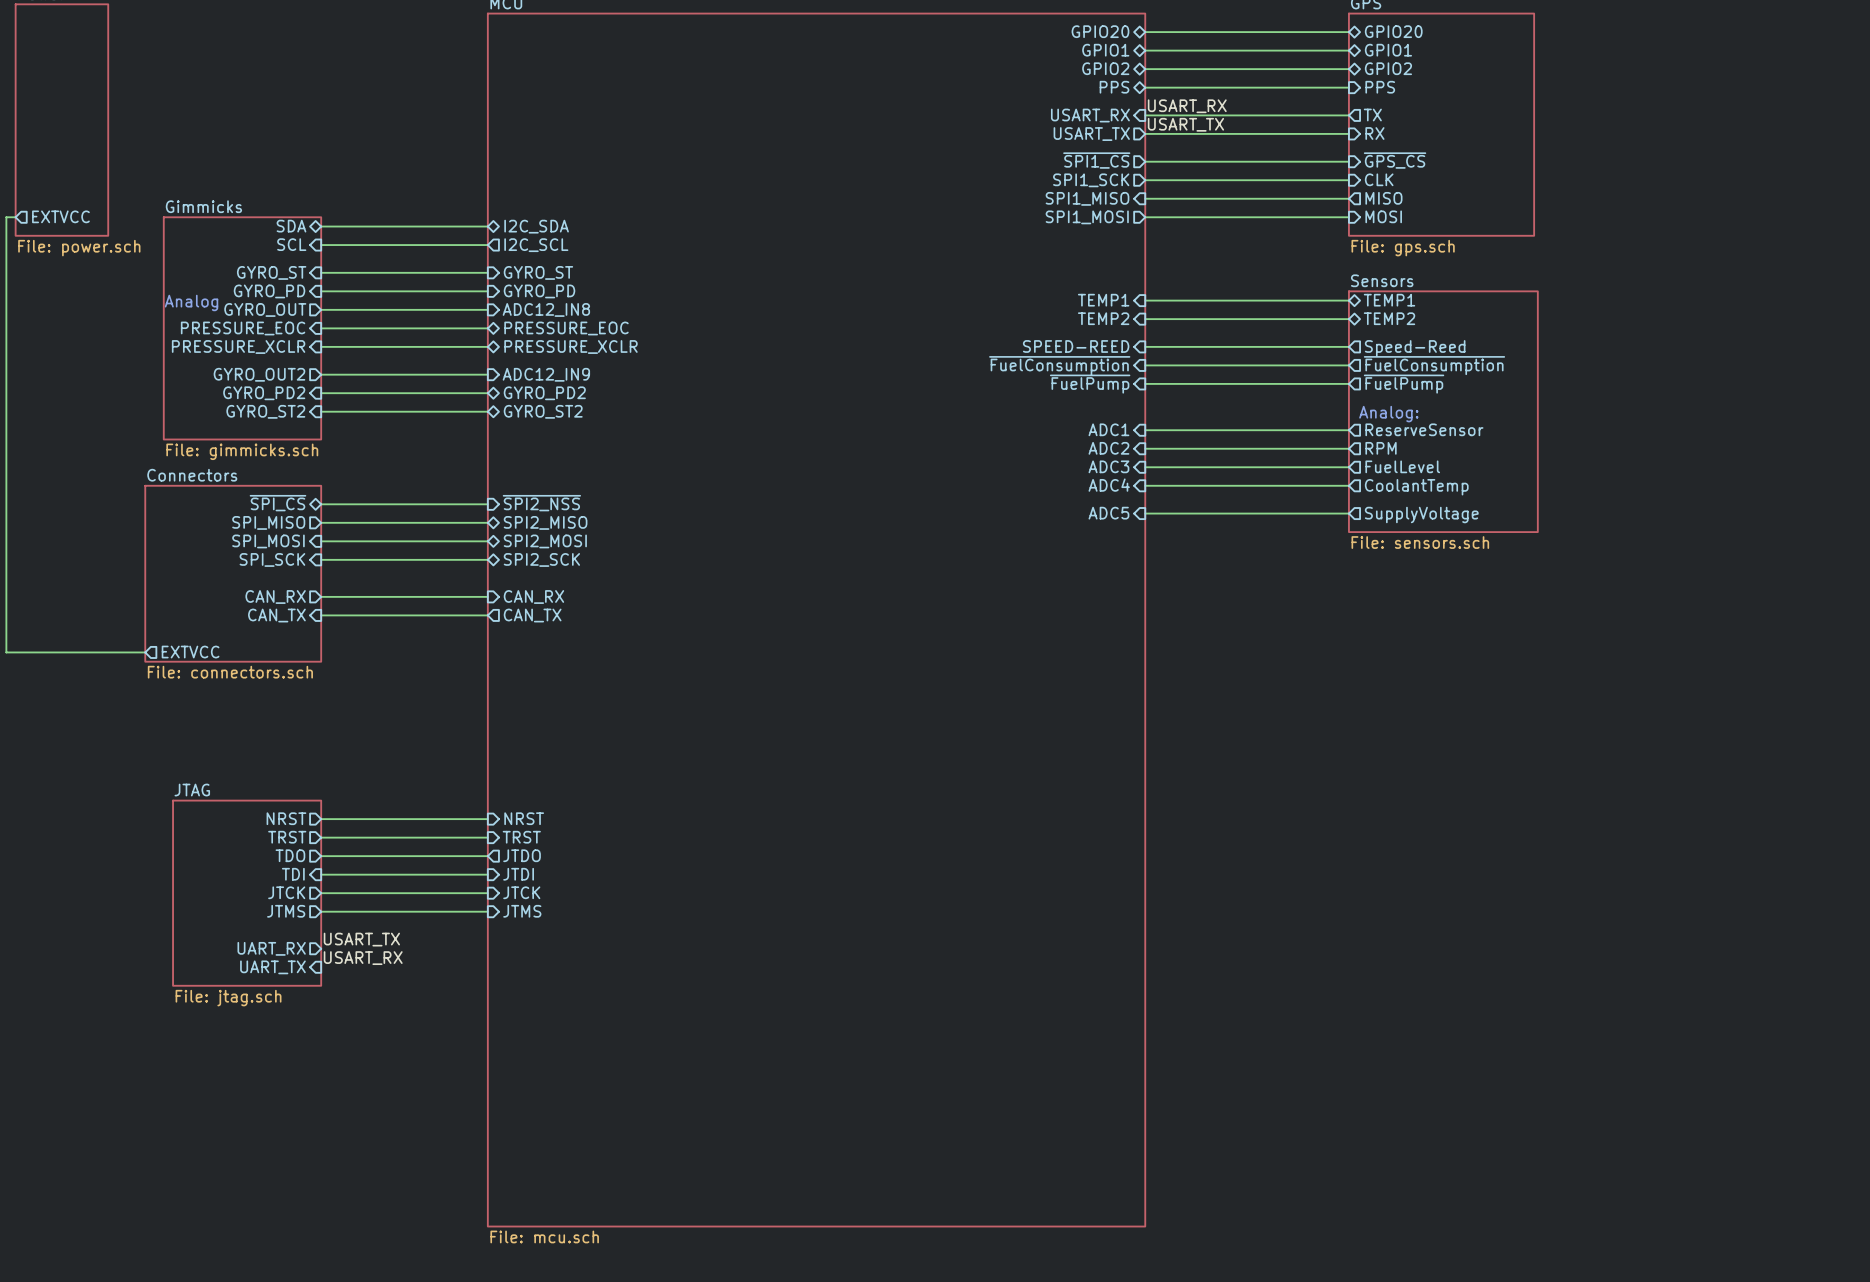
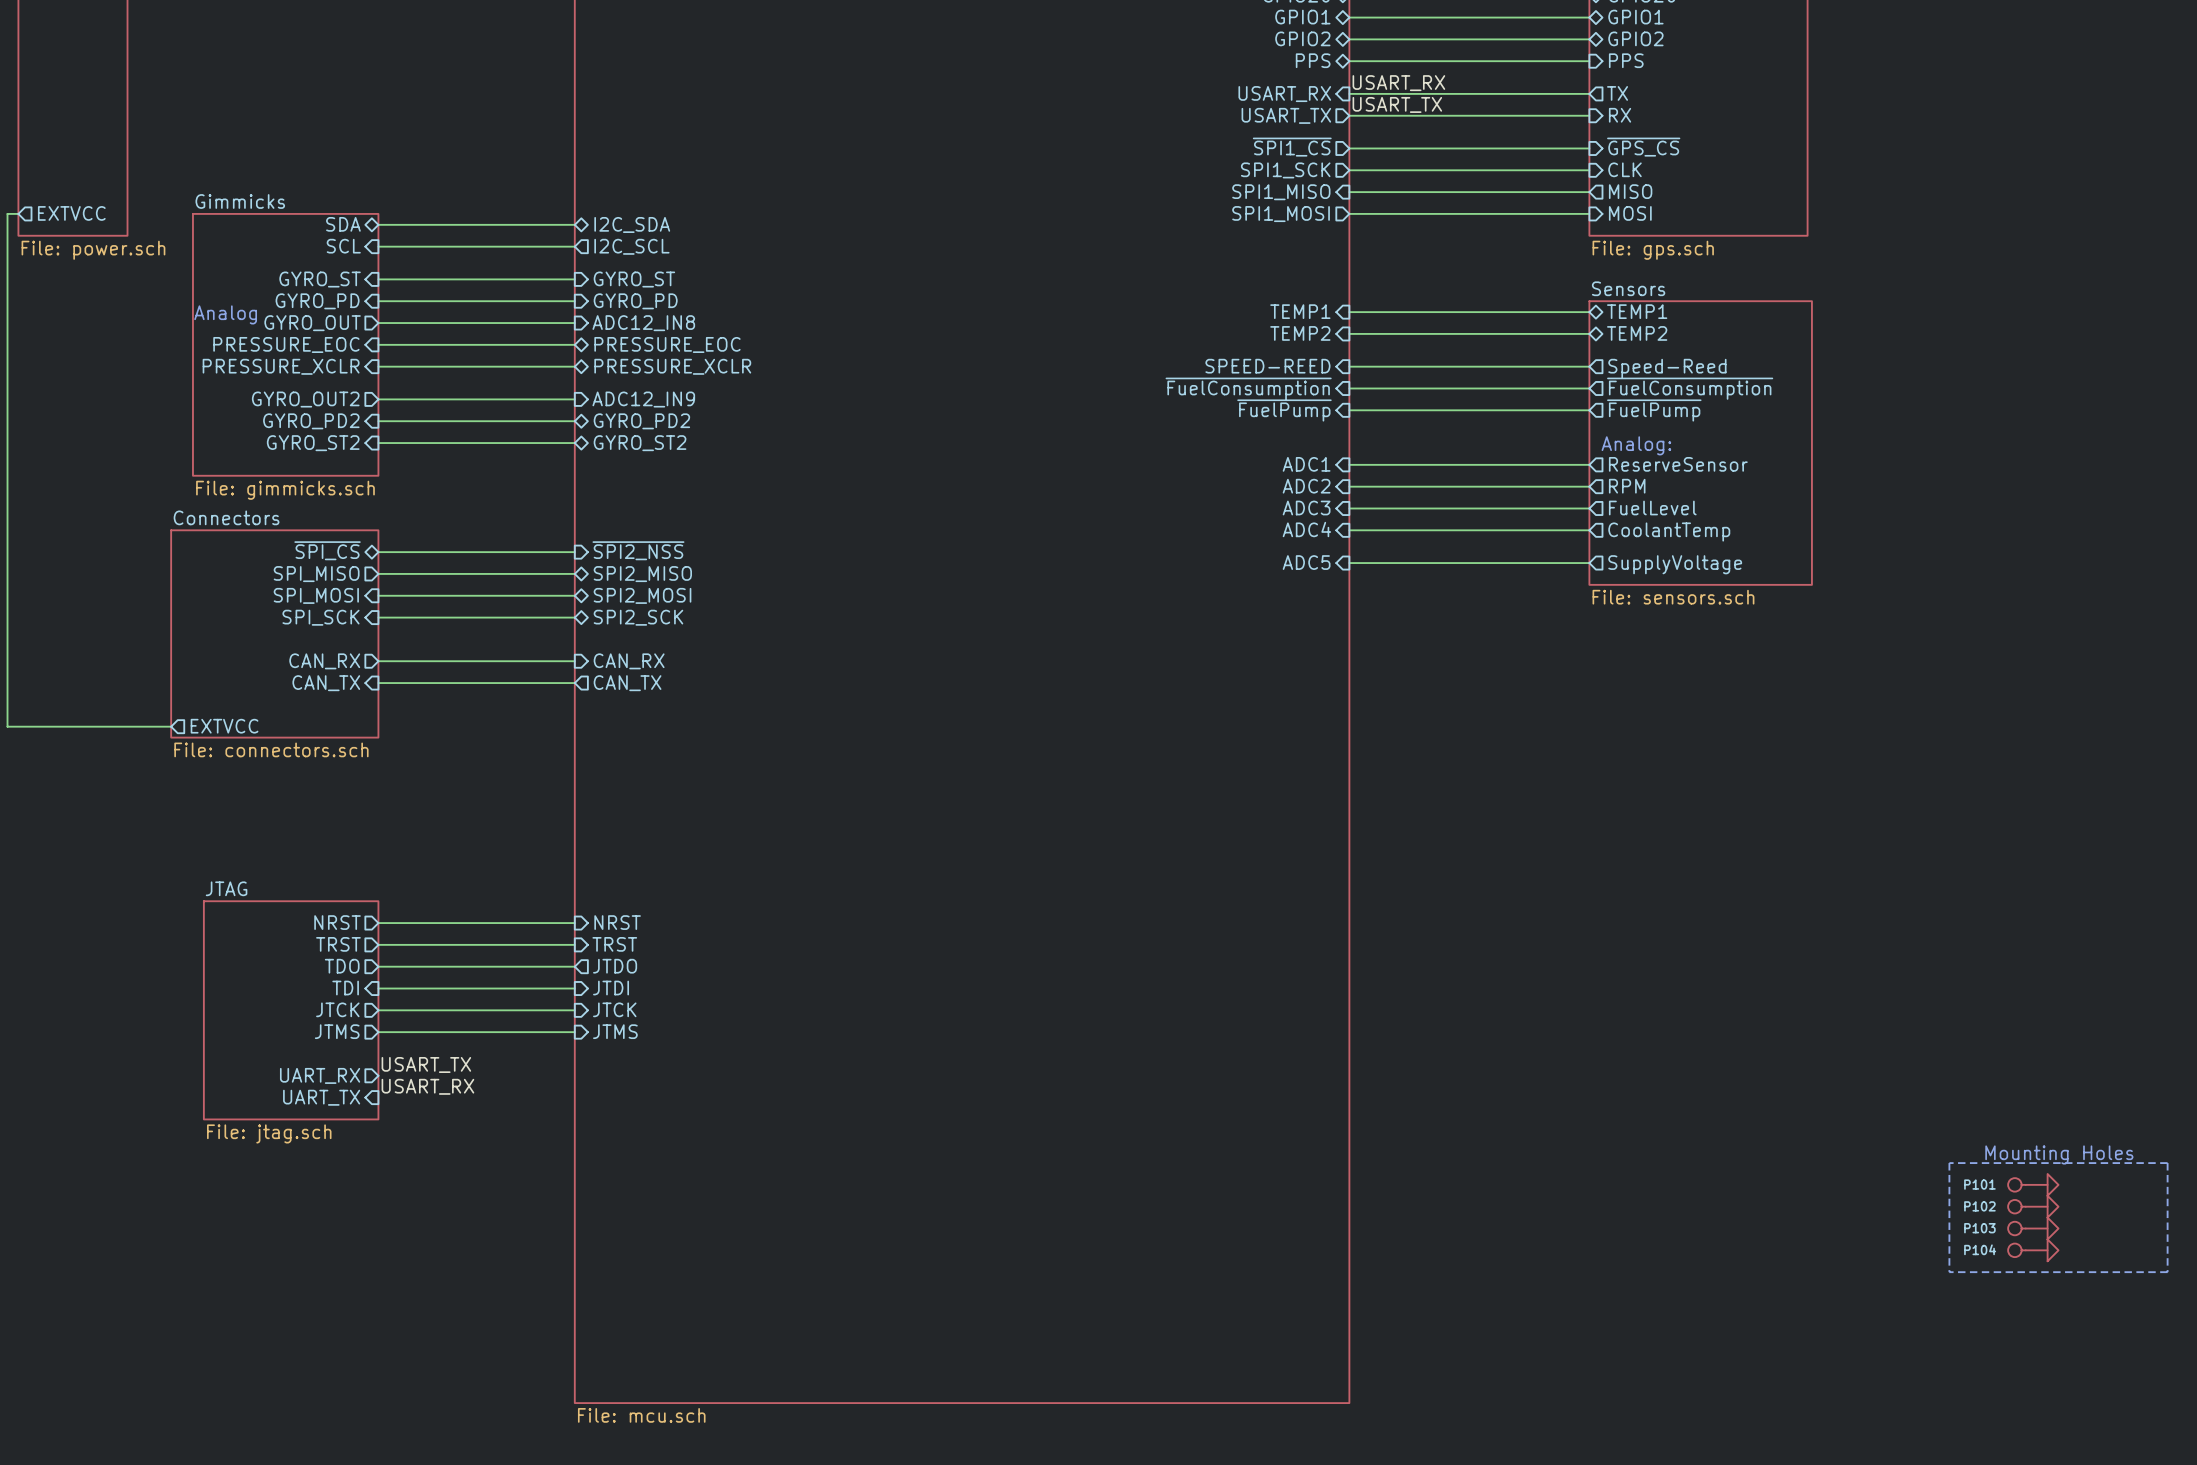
text: none -> Mounting Holes (2059, 1154)
line: none -> (1949, 1163) (2167, 1163) (2167, 1272) (1949, 1272) (1949, 1163)
P101: none -> (2027, 1184)
power symbol: none -> (2053, 1184)
P102: none -> (2027, 1206)
power symbol: none -> (2053, 1206)
P103: none -> (2027, 1228)
power symbol: none -> (2053, 1228)
P104: none -> (2027, 1250)
power symbol: none -> (2053, 1250)

